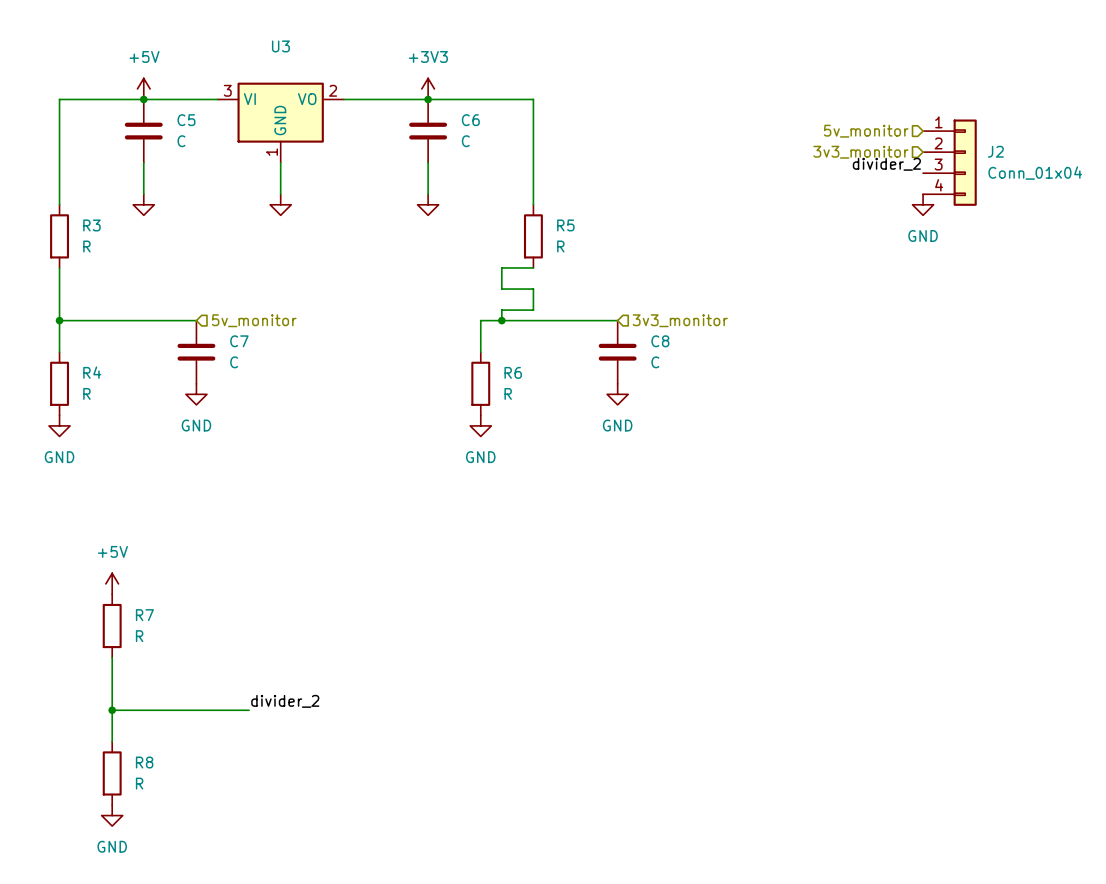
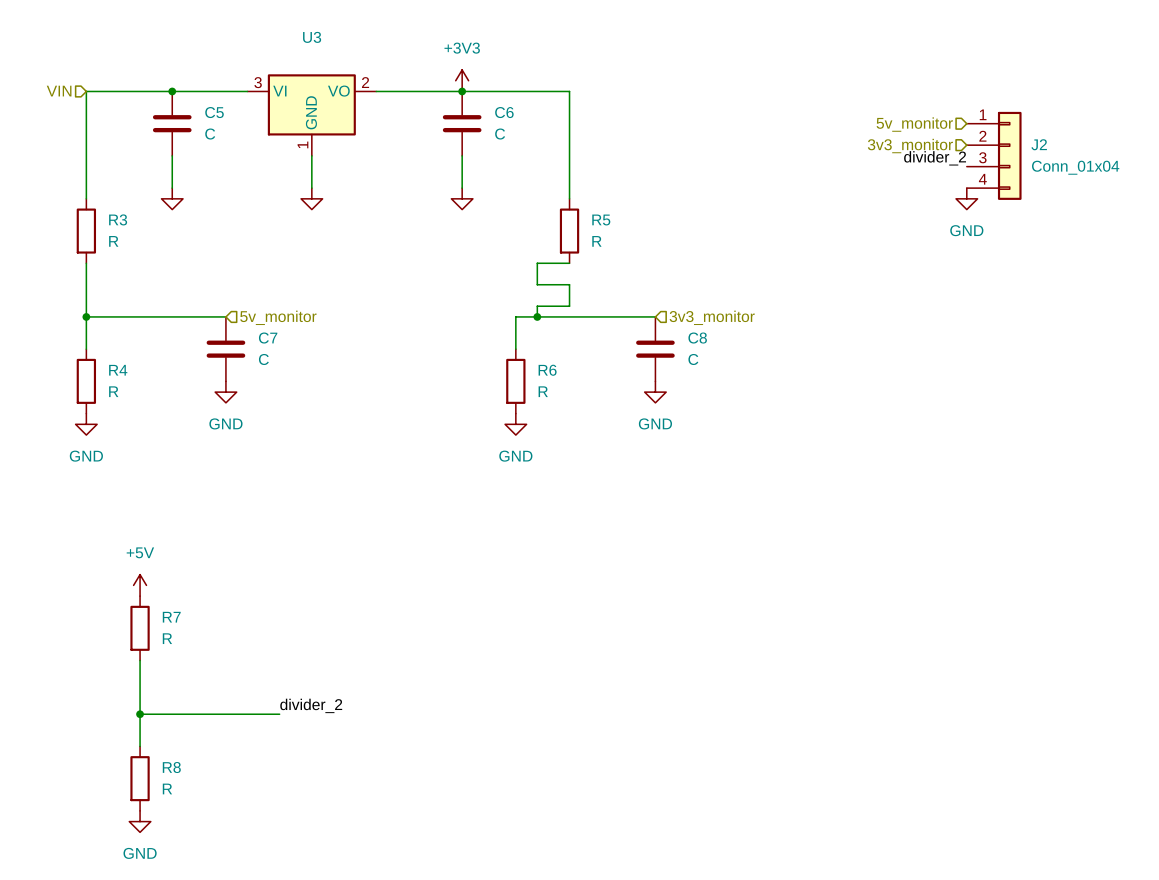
power symbol: +5V (143, 88) -> none
hierarchical label: none -> VIN (59, 91)

